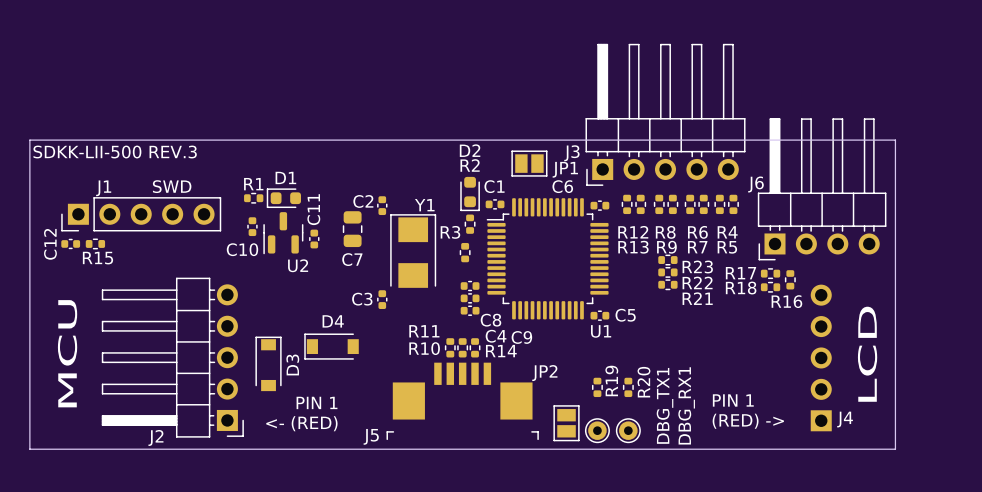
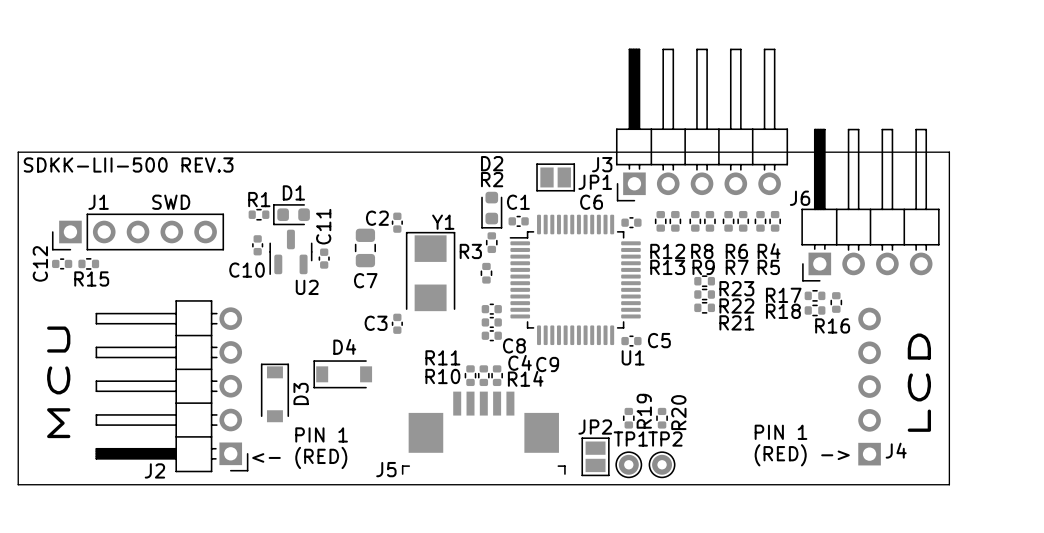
JP2 name position: JP2 (544, 373) -> JP2 (595, 427)
DBG_TX1 name: DBG_TX1 (665, 405) -> TP1 (630, 439)
DBG_RX1 name: DBG_RX1 (686, 405) -> TP2 (665, 439)

